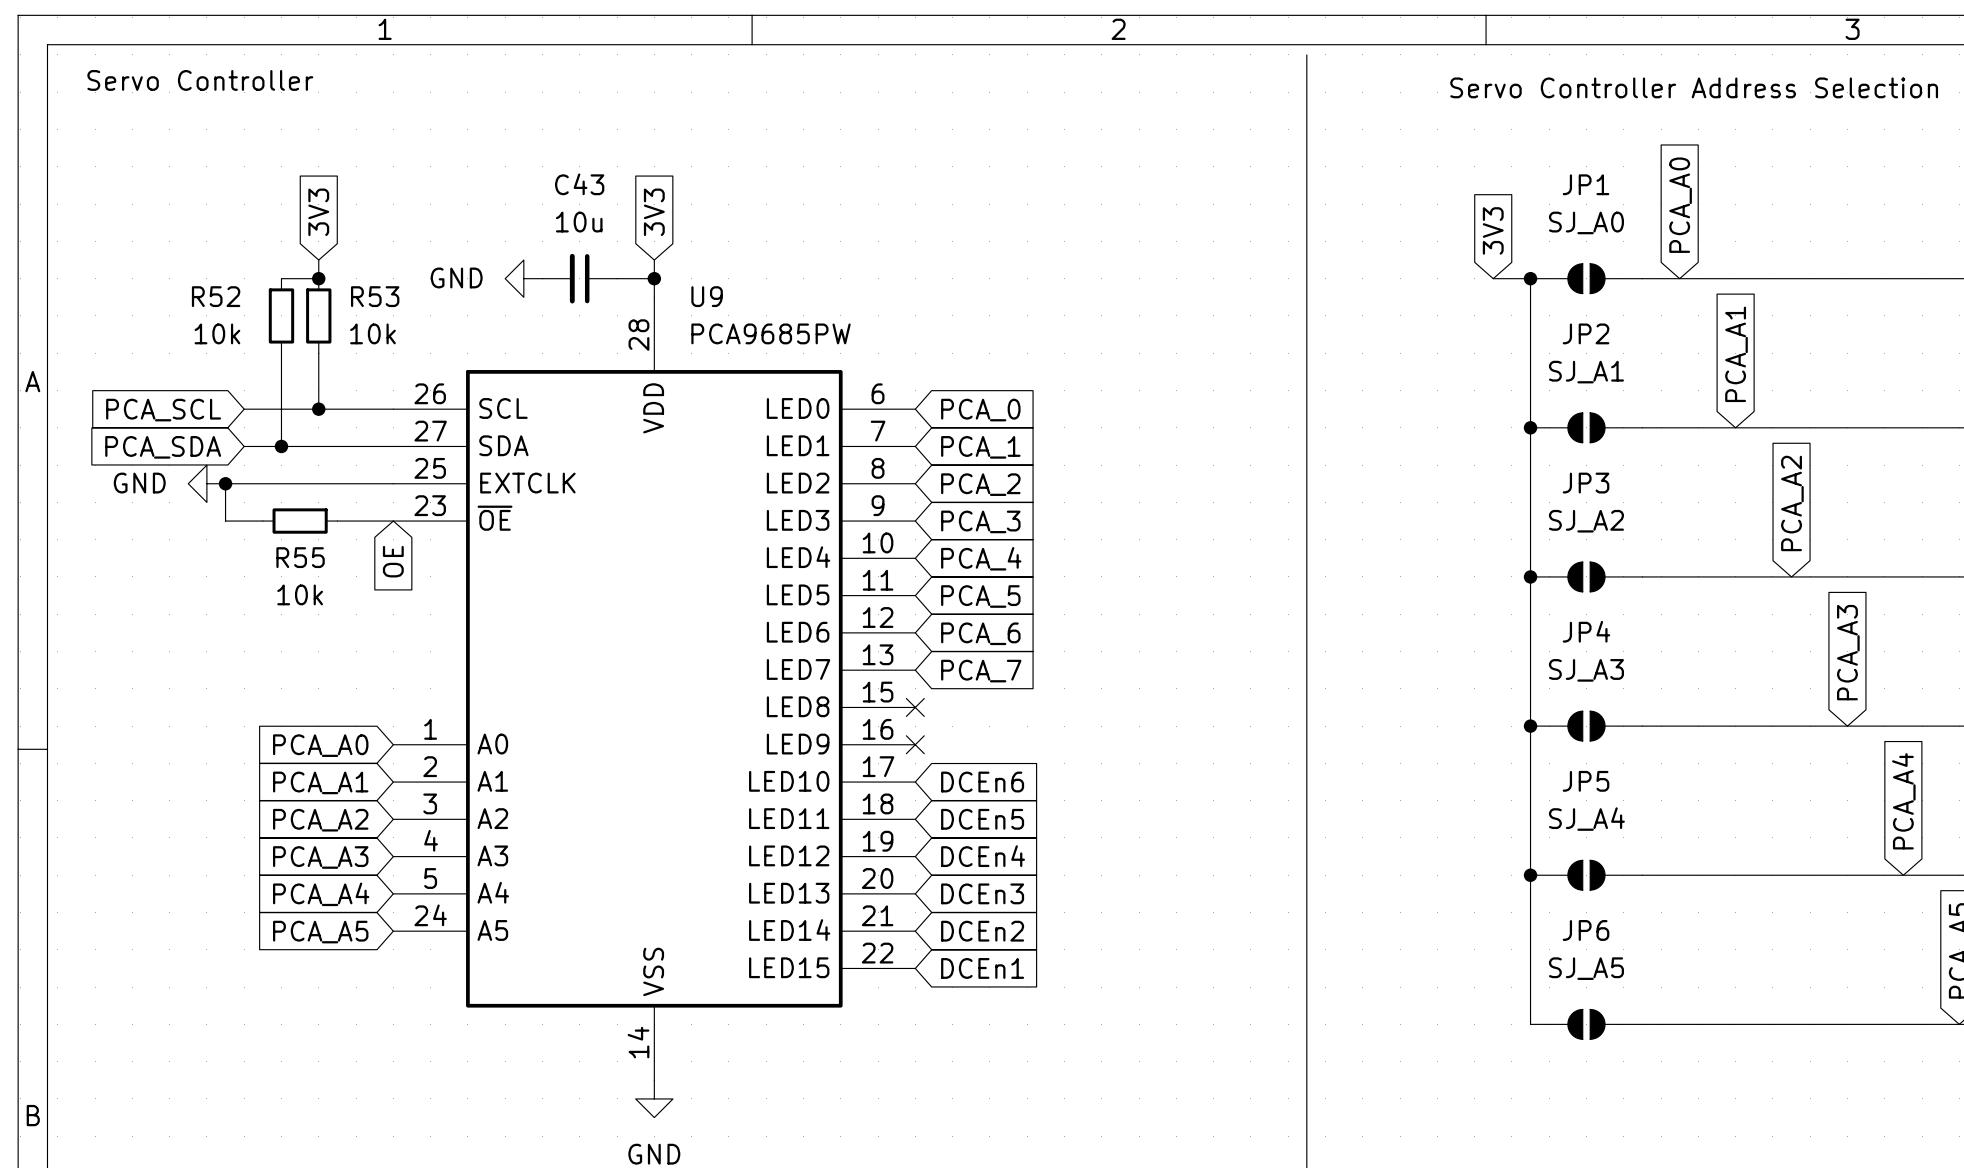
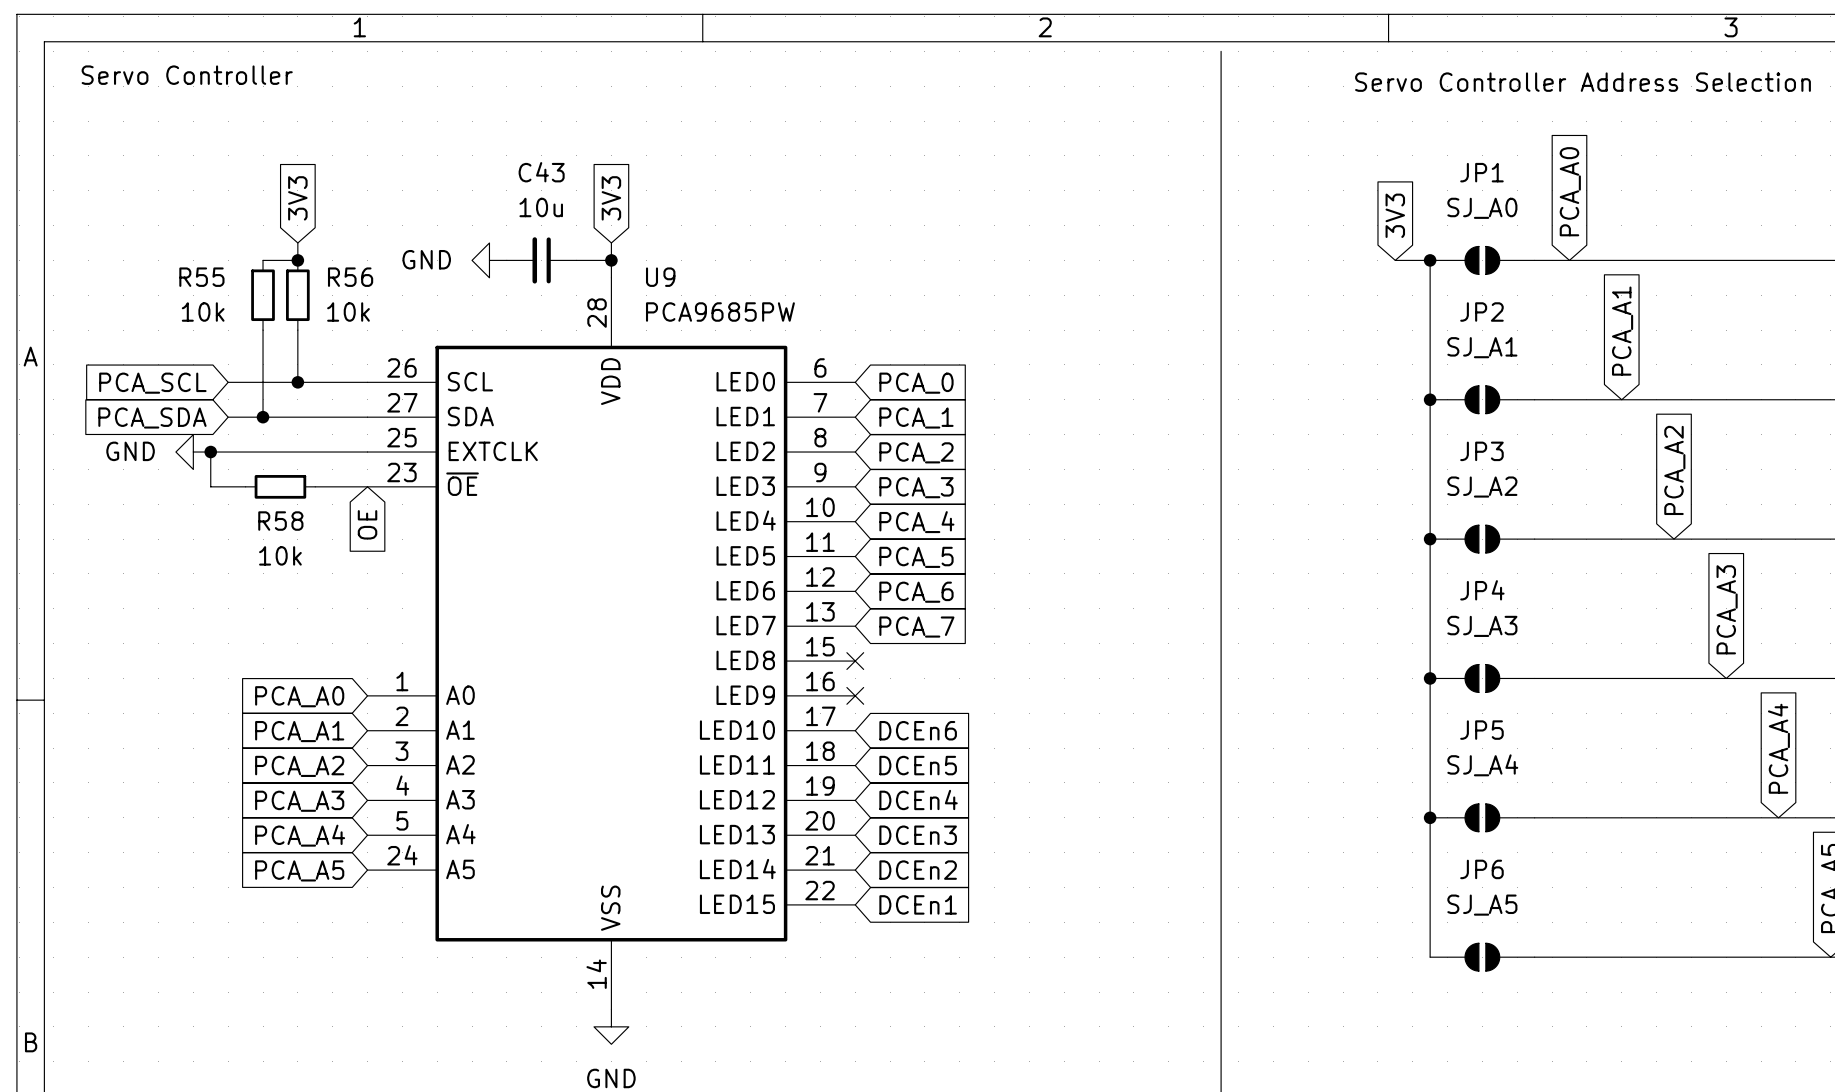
R52 name: R52 (216, 296) -> R55 (201, 277)
R53 name: R53 (375, 296) -> R56 (350, 277)
R55 name: R55 (300, 557) -> R58 (280, 521)

